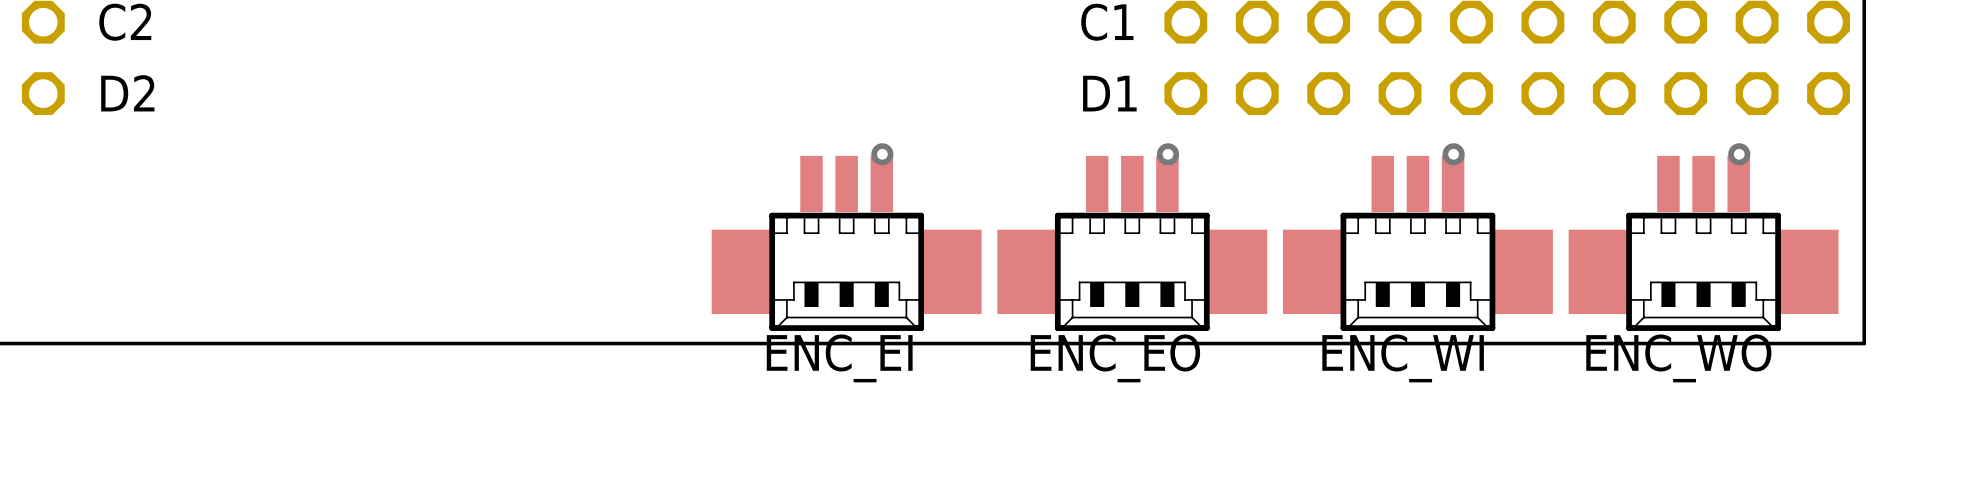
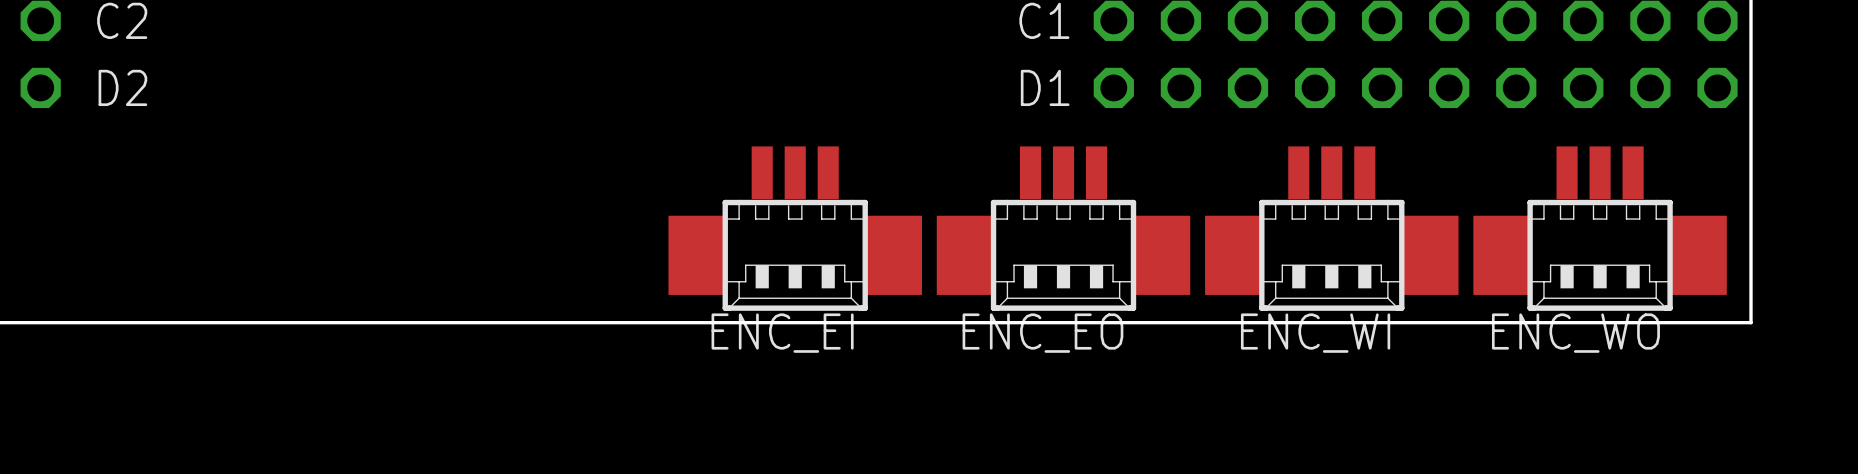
via: (882, 154) -> none
via: (1168, 154) -> none
via: (1453, 154) -> none
via: (1739, 154) -> none

